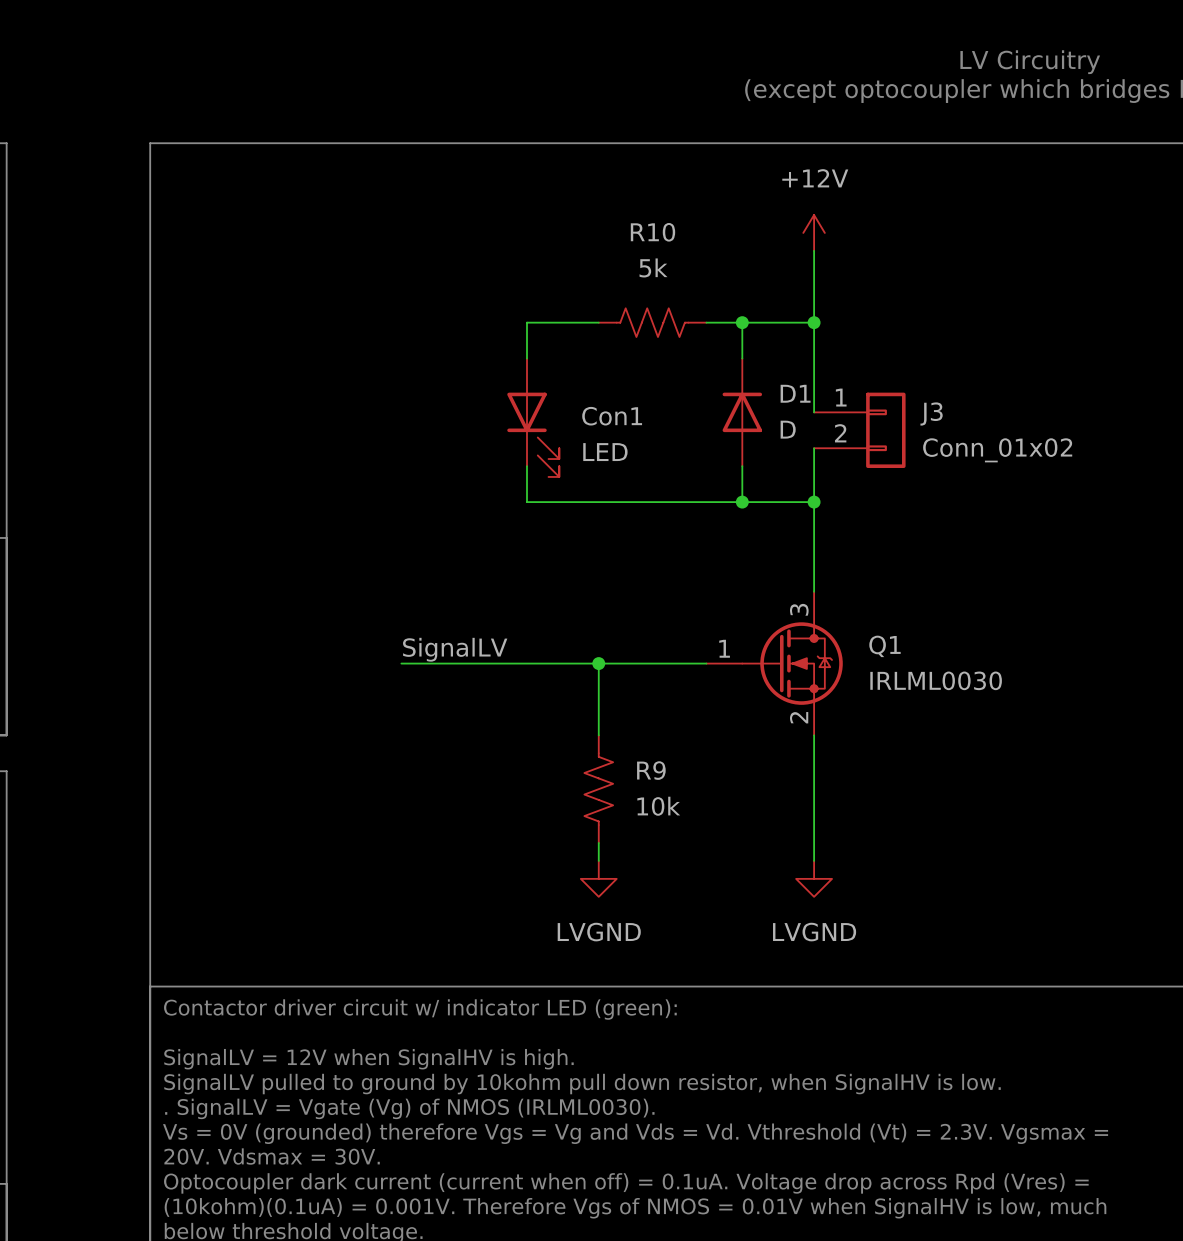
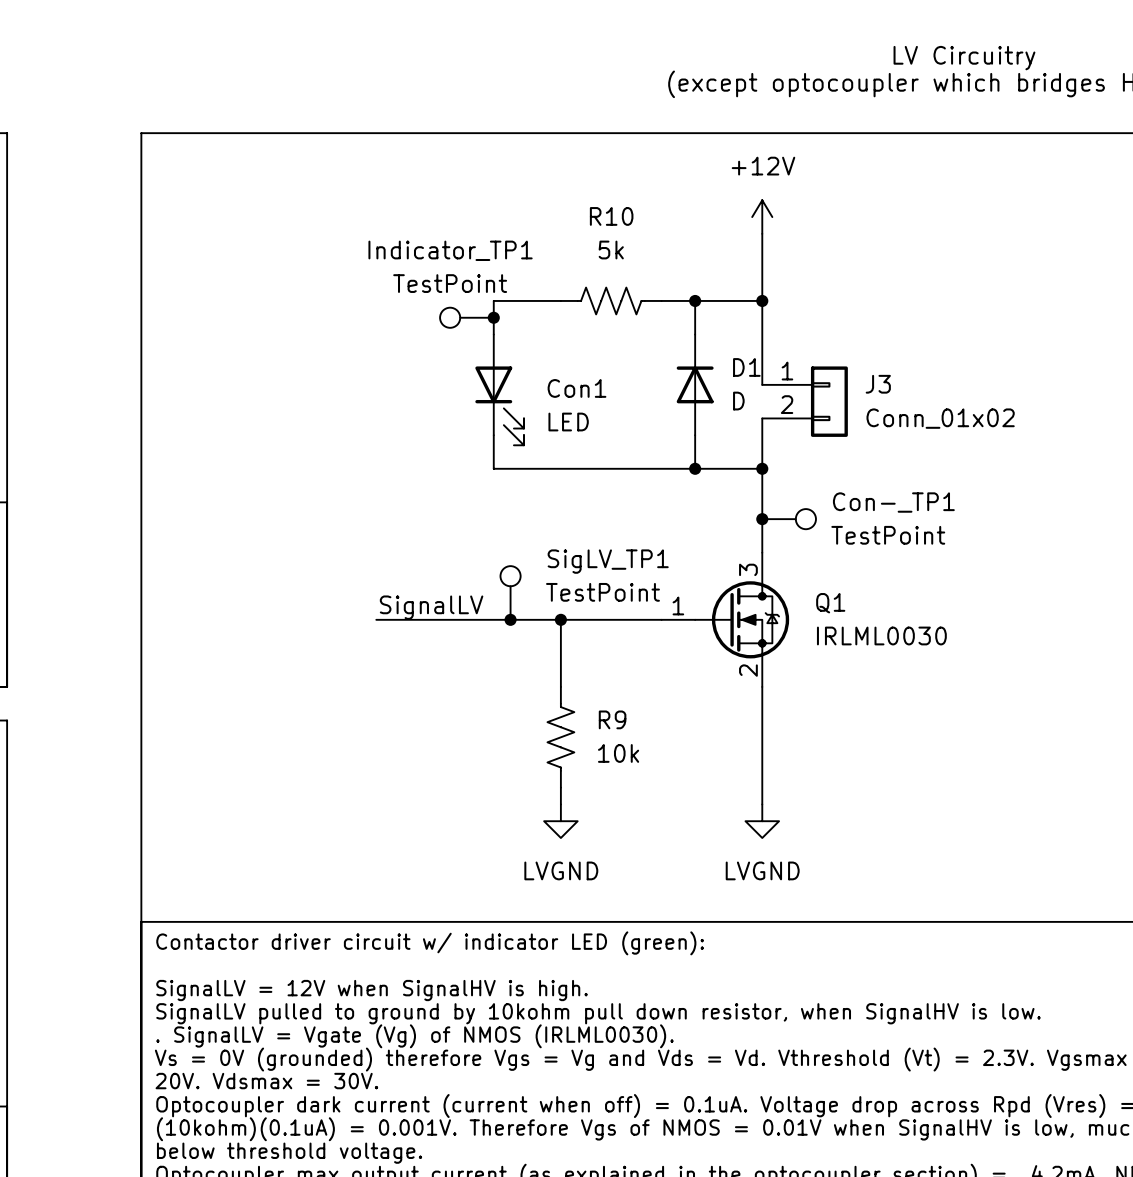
Indicator_TP1: none -> TestPoint (466, 317)
junction: none -> (493, 317)
junction: none -> (762, 519)
Con-_TP1: none -> TestPoint (789, 519)
SigLV_TP1: none -> TestPoint (510, 592)
junction: none -> (510, 619)

